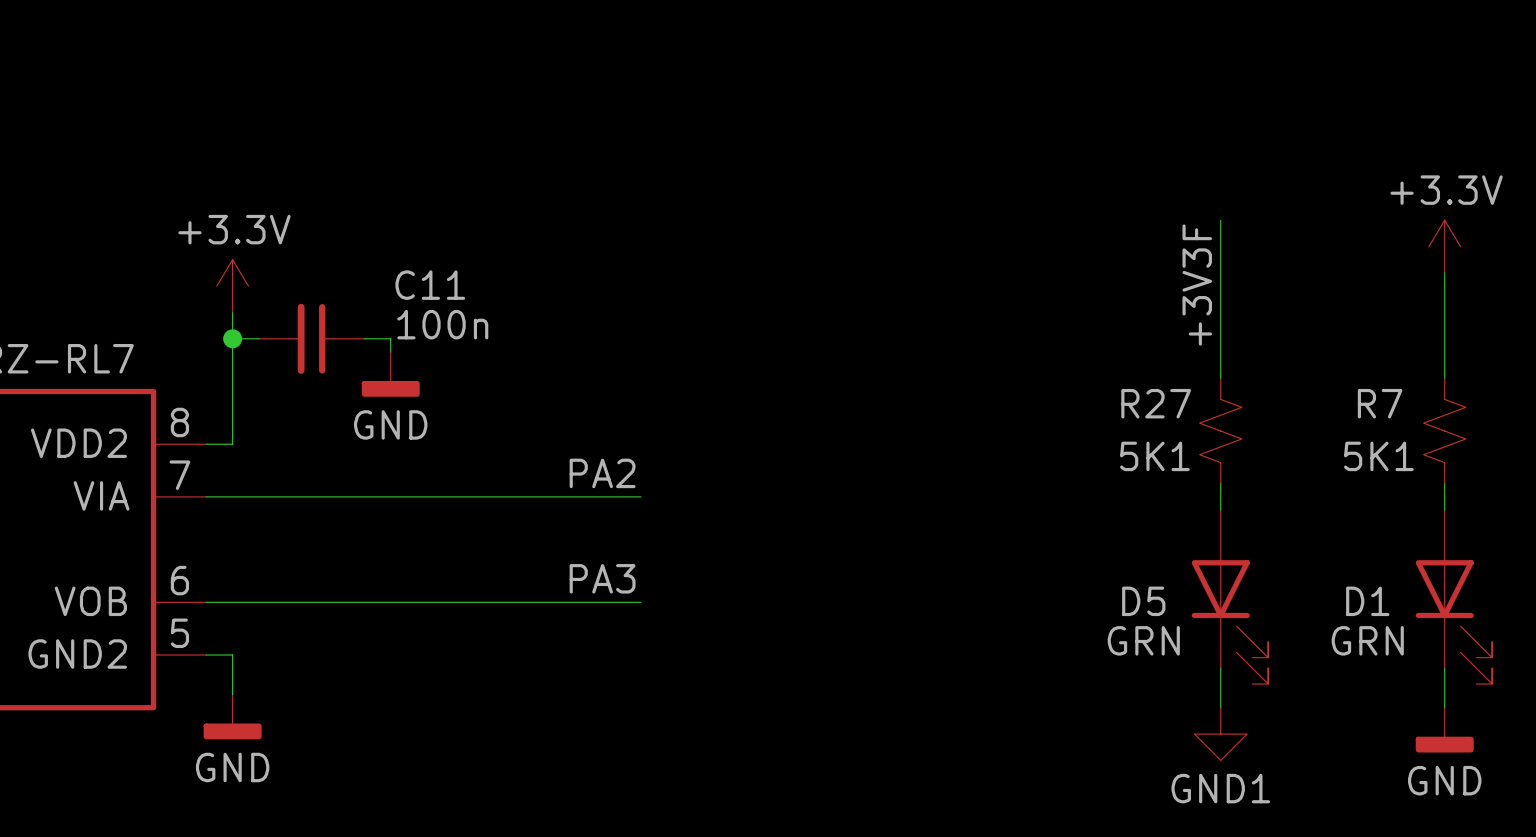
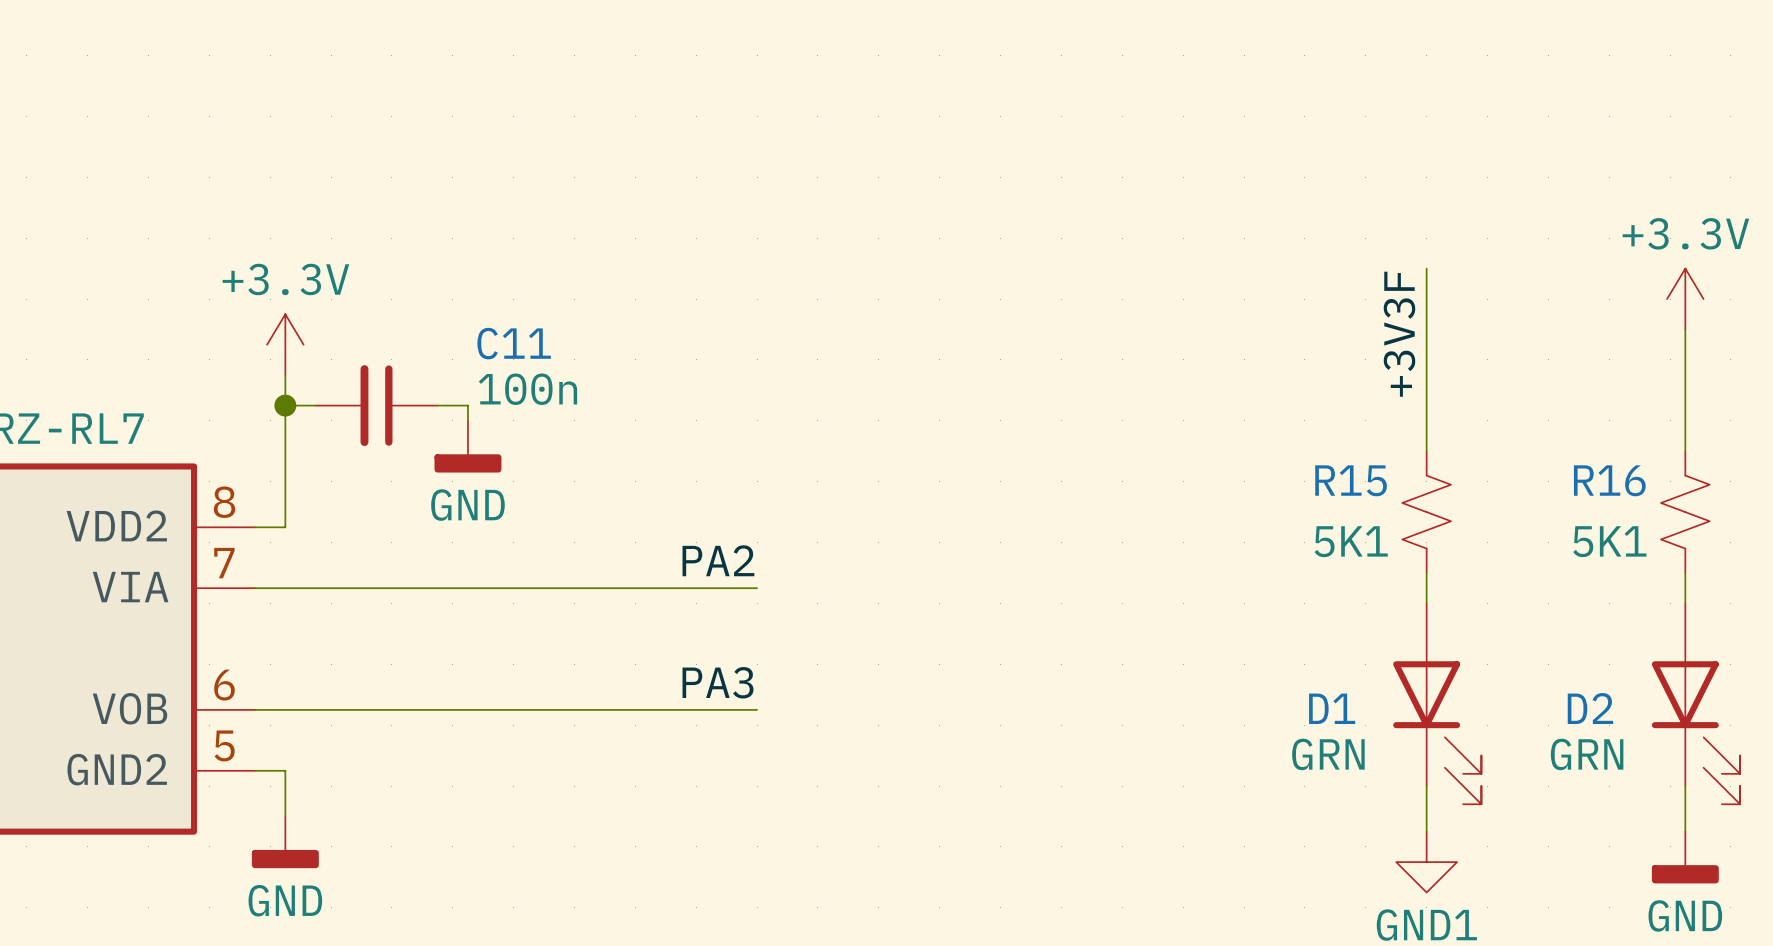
R27 name: R27 (1156, 403) -> R15 (1351, 480)
R7 name: R7 (1380, 403) -> R16 (1609, 480)
D5 name: D5 (1143, 601) -> D1 (1332, 708)
D1 name: D1 (1367, 601) -> D2 (1590, 708)

